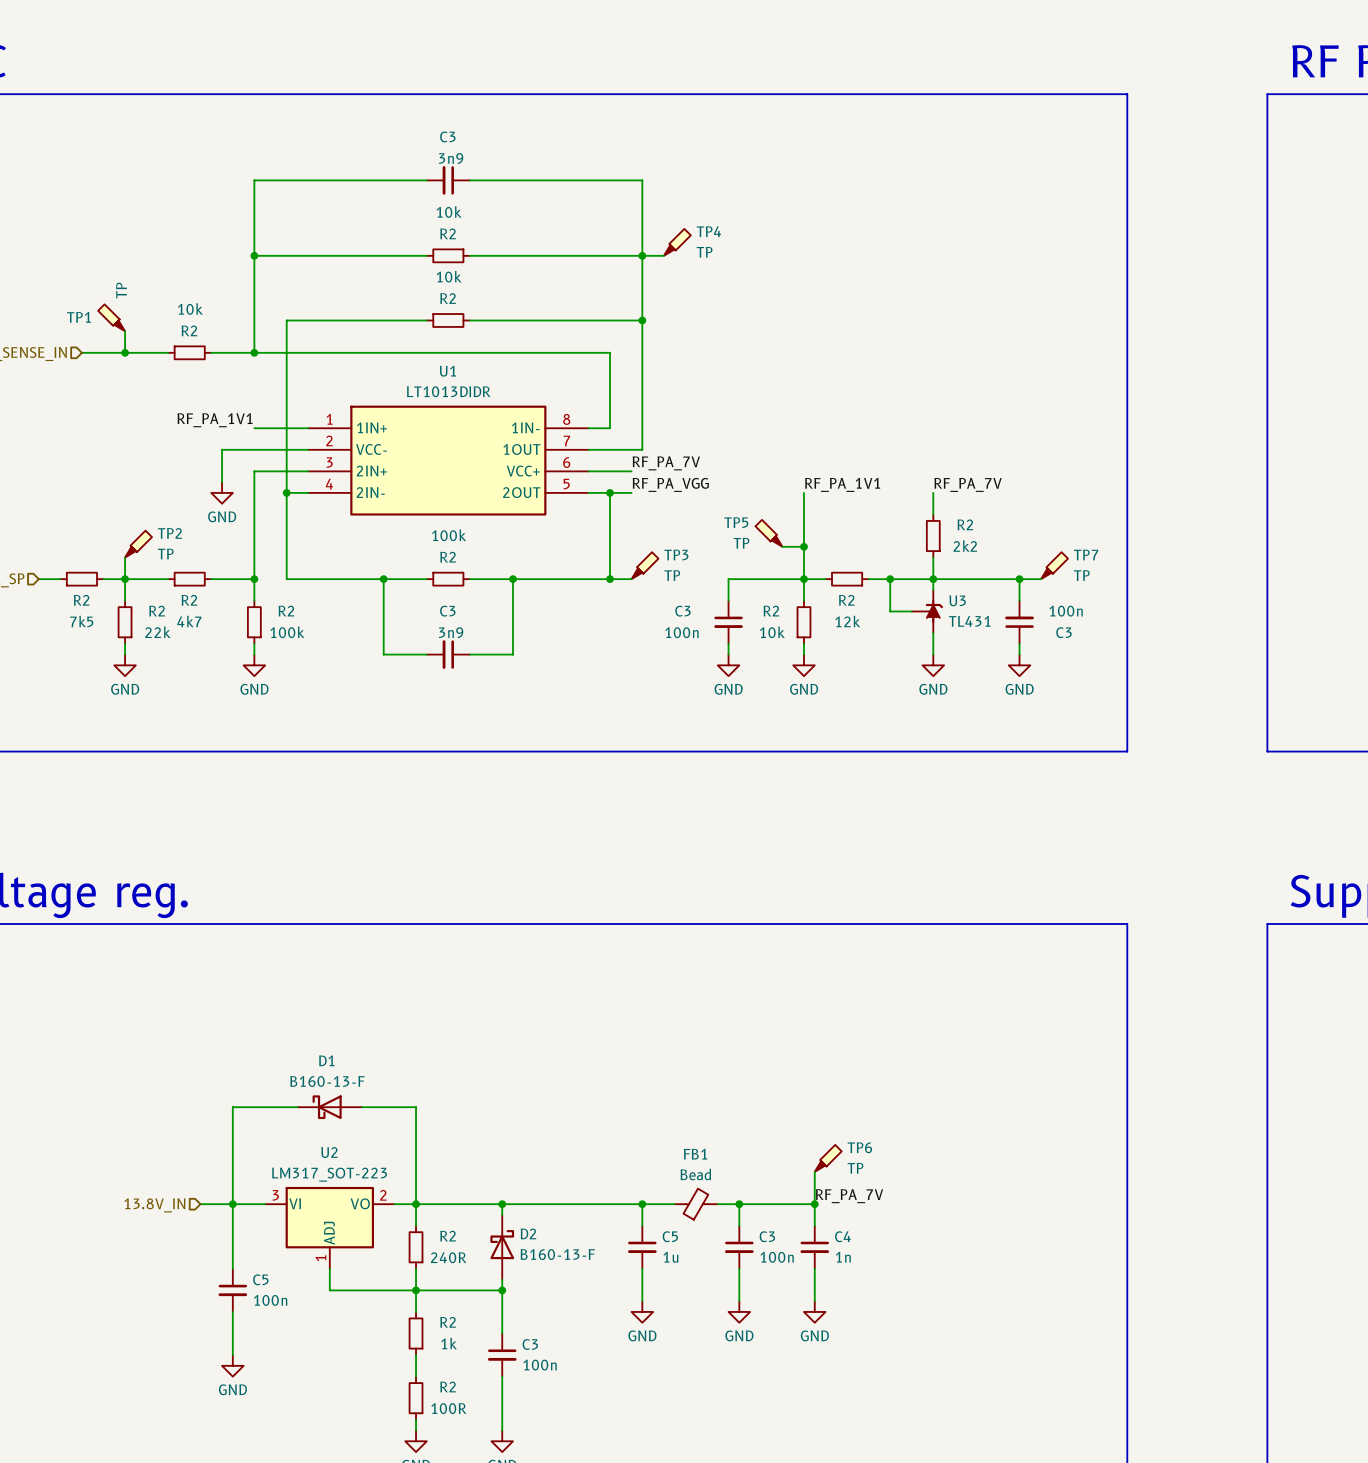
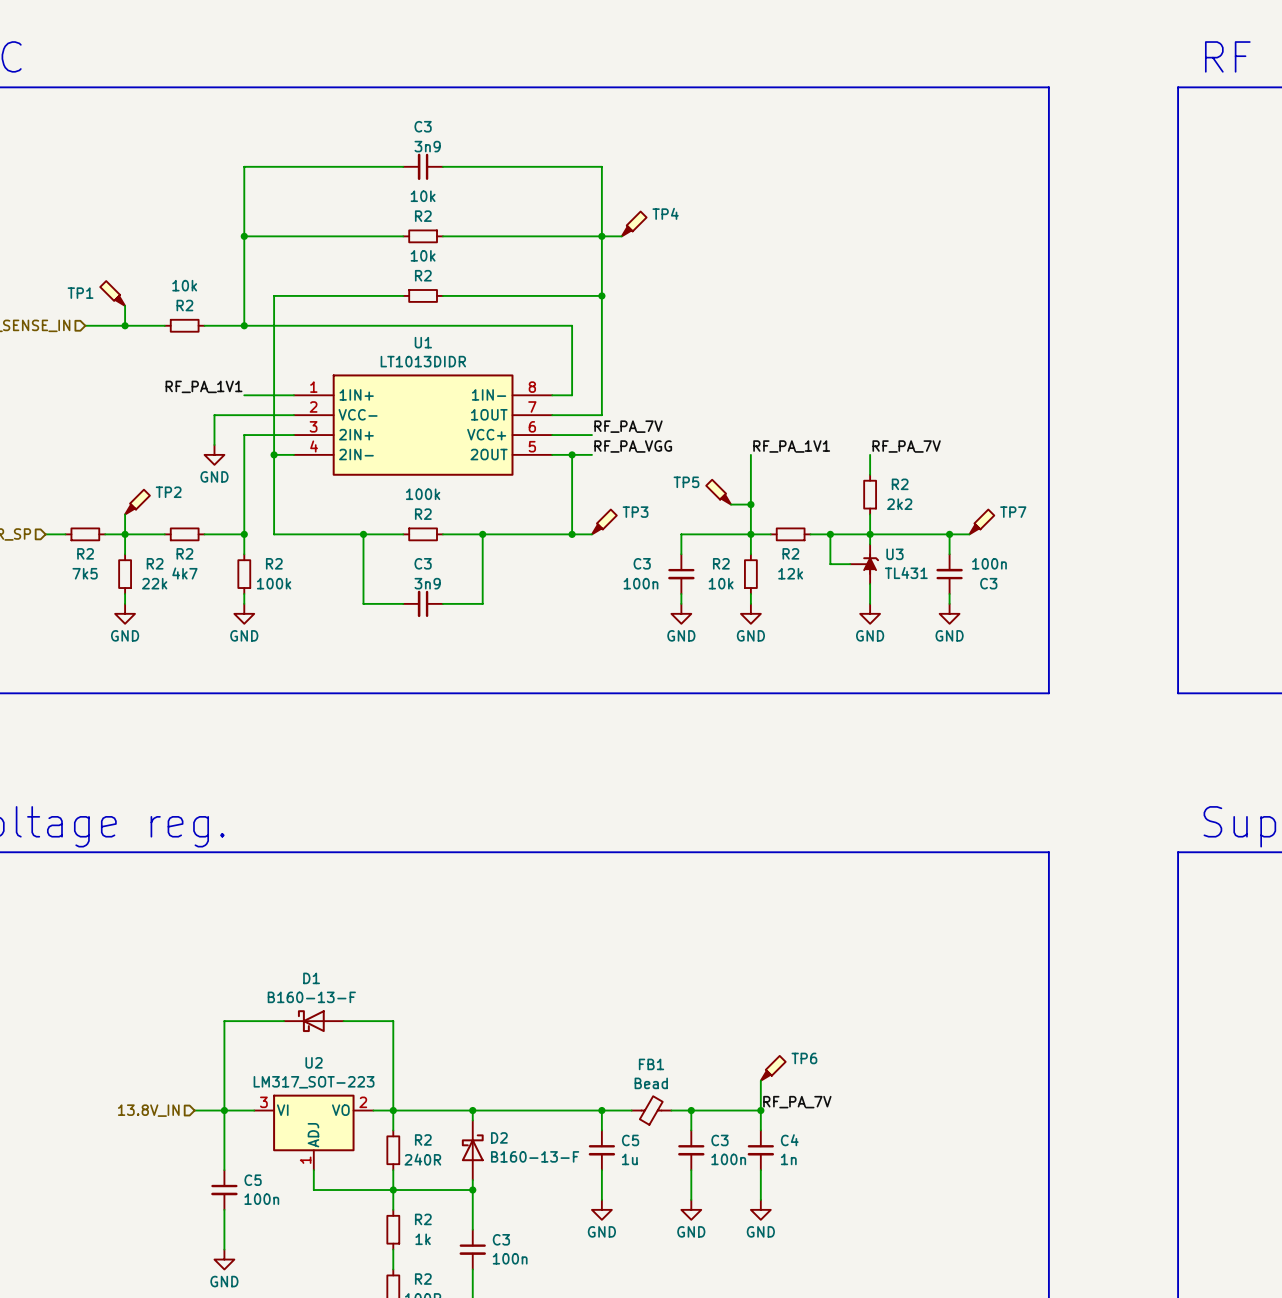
TP4 value: TP (704, 252) -> none
TP1 value: TP (121, 290) -> none
TP5 value: TP (741, 543) -> none
TP2 value: TP (165, 554) -> none
TP3 value: TP (672, 575) -> none
TP7 value: TP (1081, 575) -> none
TP6 value: TP (855, 1168) -> none

